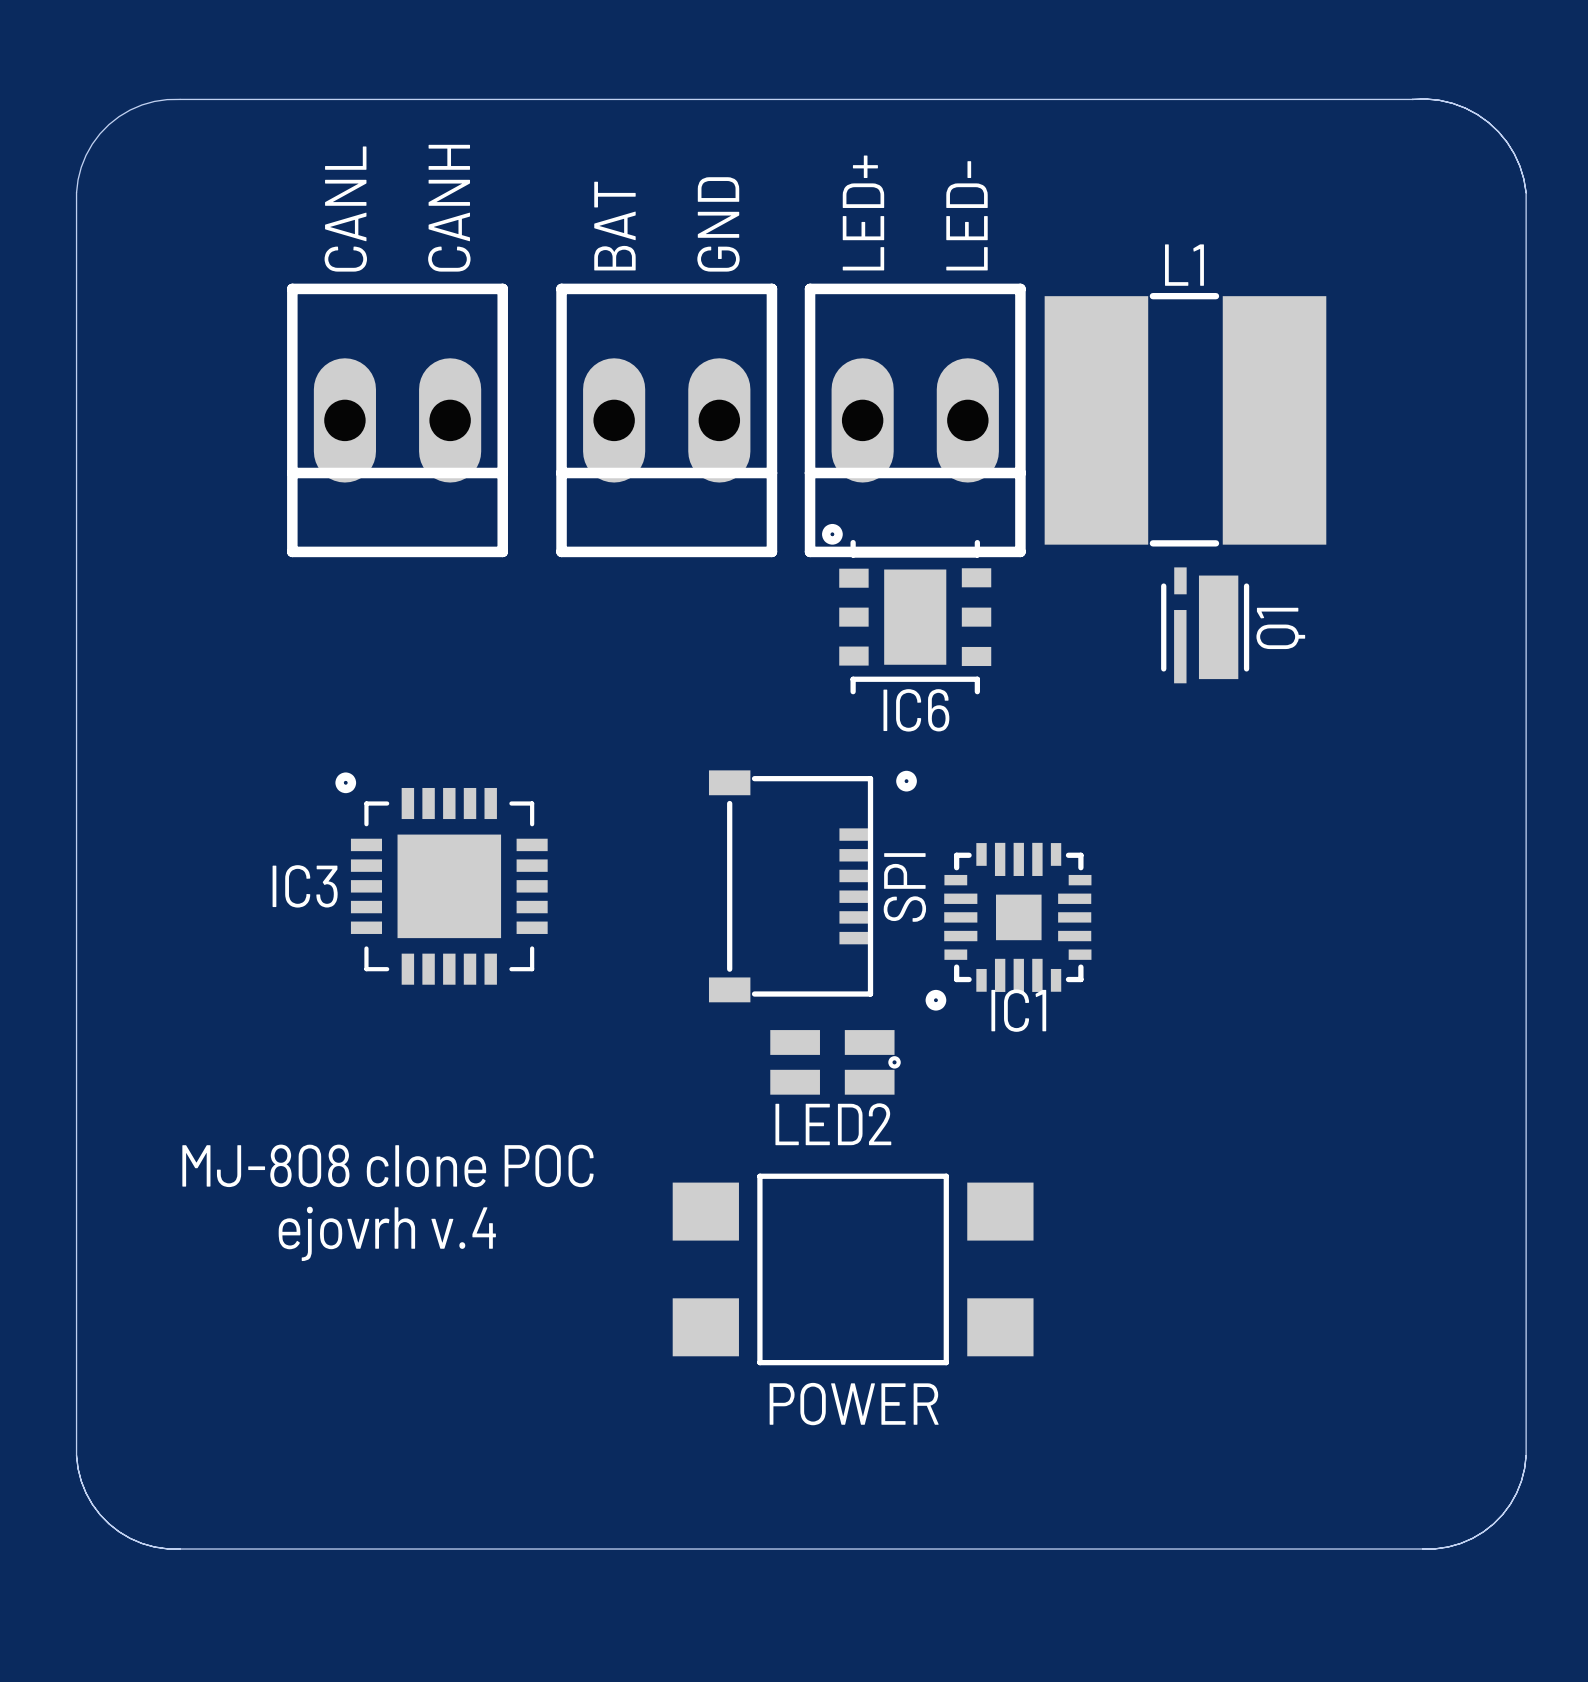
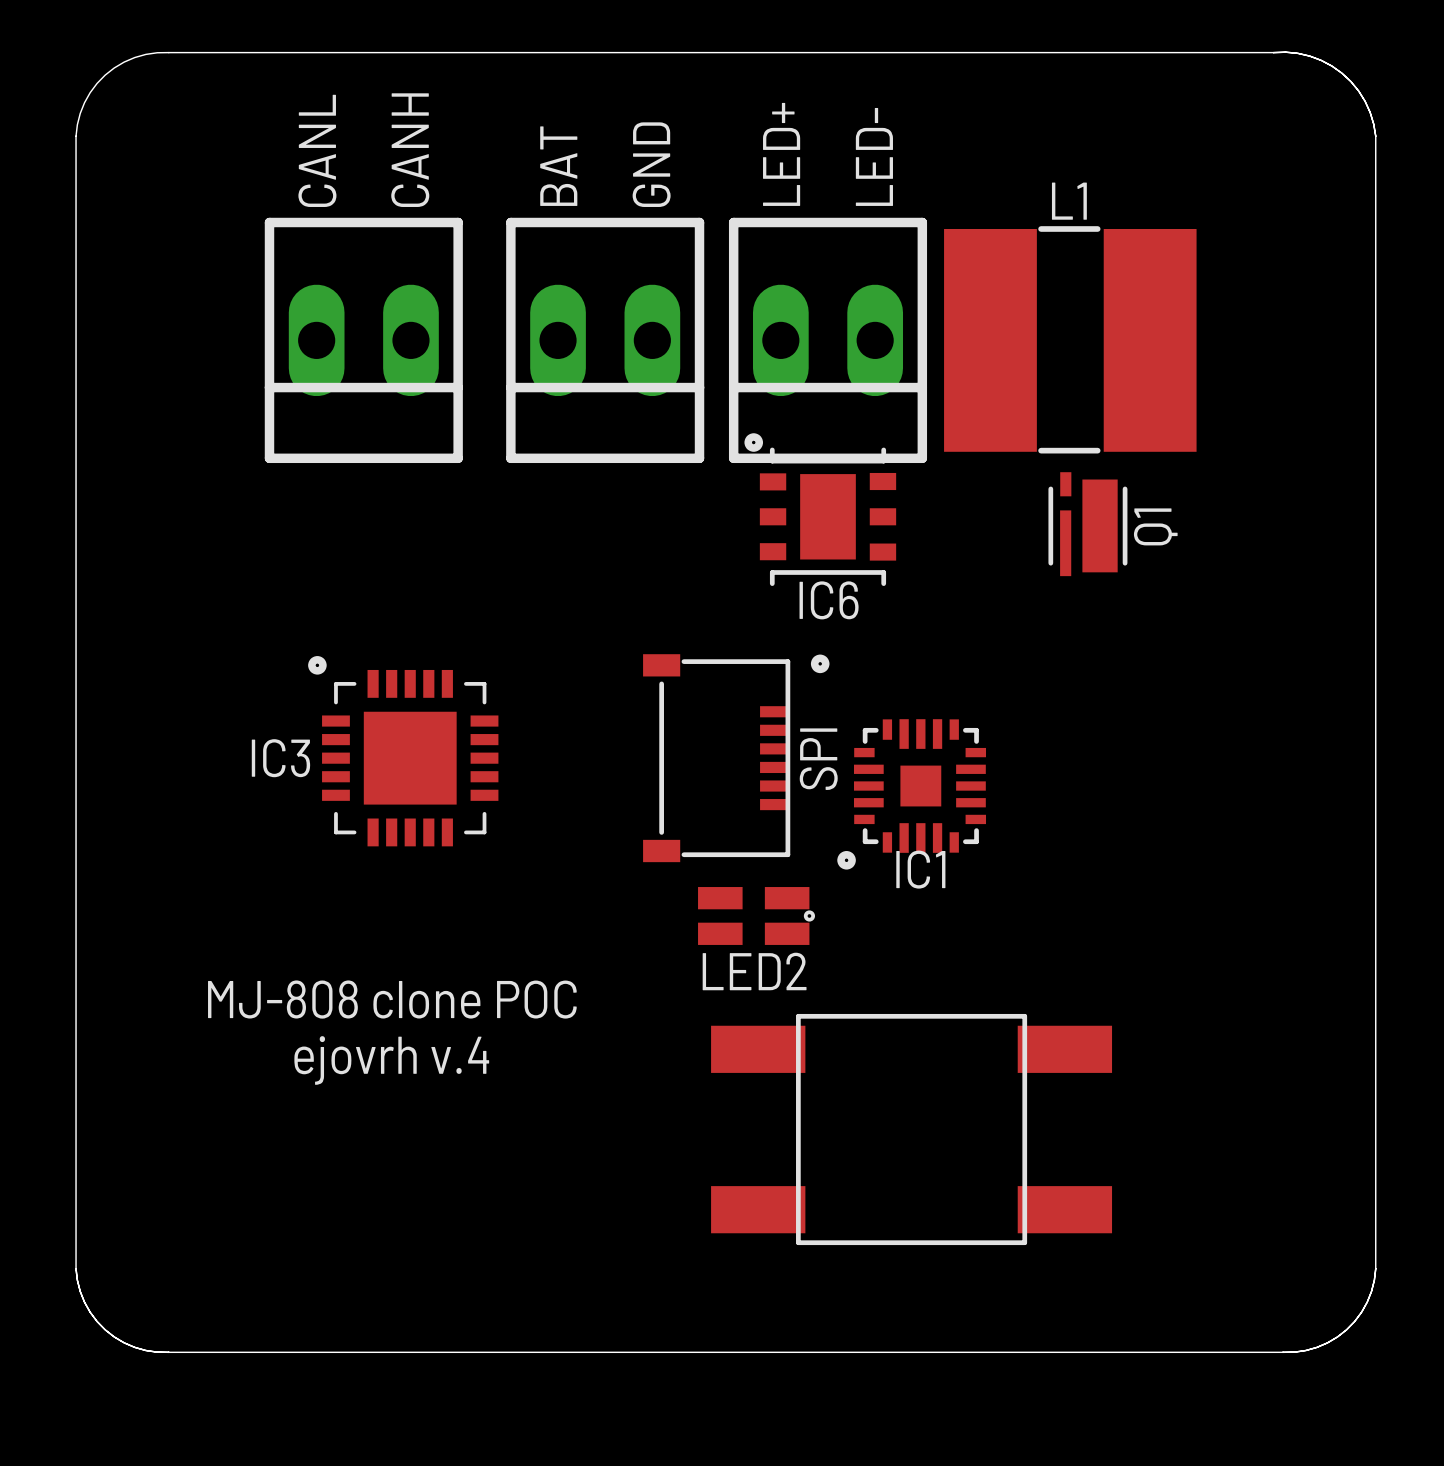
text position: MJ-808 clone POC (387, 1165) -> MJ-808 clone POC (392, 999)
text position: ejovrh v.4 (387, 1233) -> ejovrh v.4 (391, 1060)
POWER: (853, 1269) -> none
part: none -> (911, 1129)

